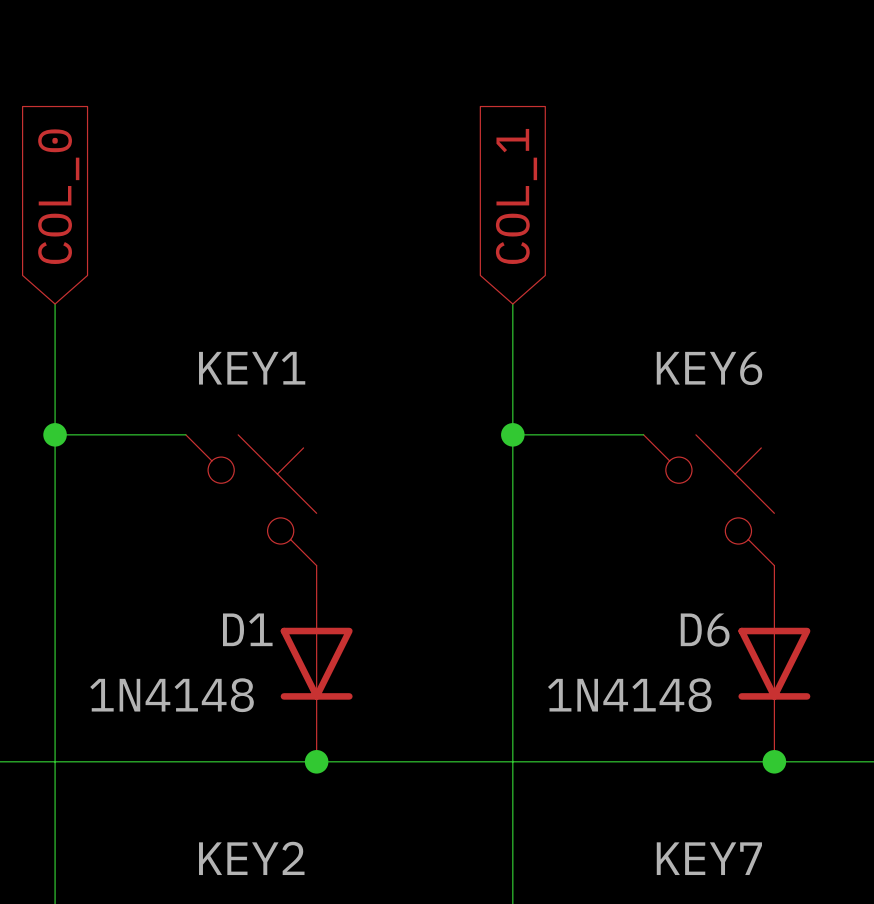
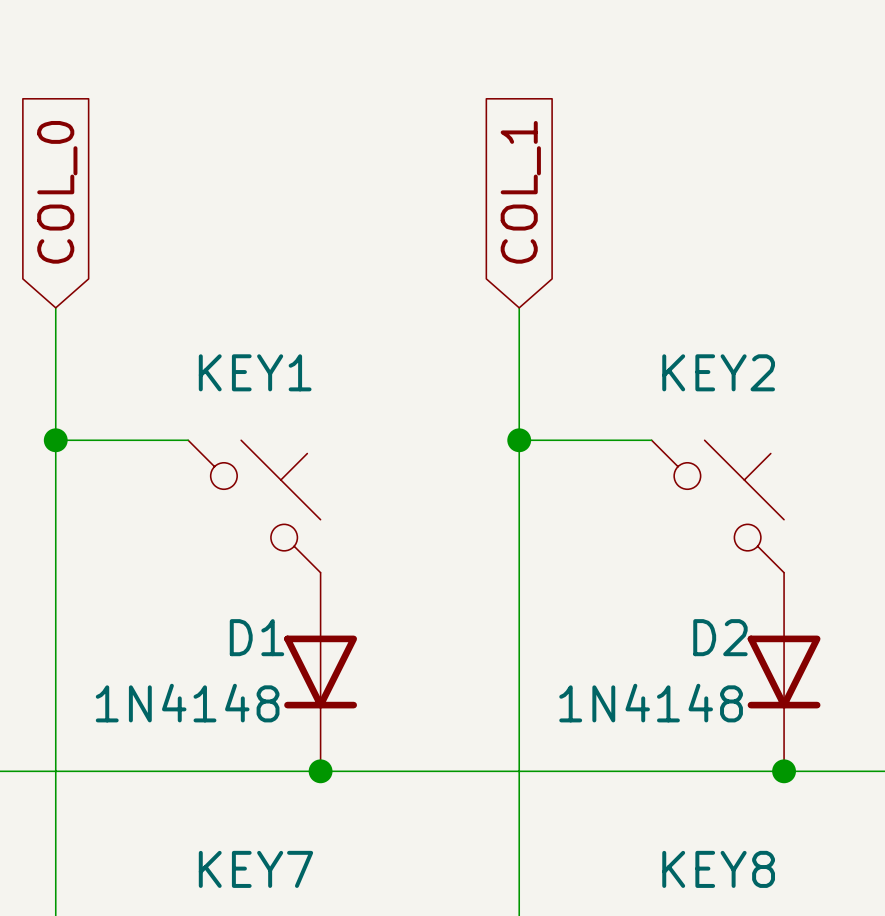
KEY6 name: KEY6 (709, 368) -> KEY2 (718, 372)
D6 name: D6 (705, 630) -> D2 (720, 637)
KEY2 name: KEY2 (251, 858) -> KEY7 (255, 869)
KEY7 name: KEY7 (709, 858) -> KEY8 (718, 869)

